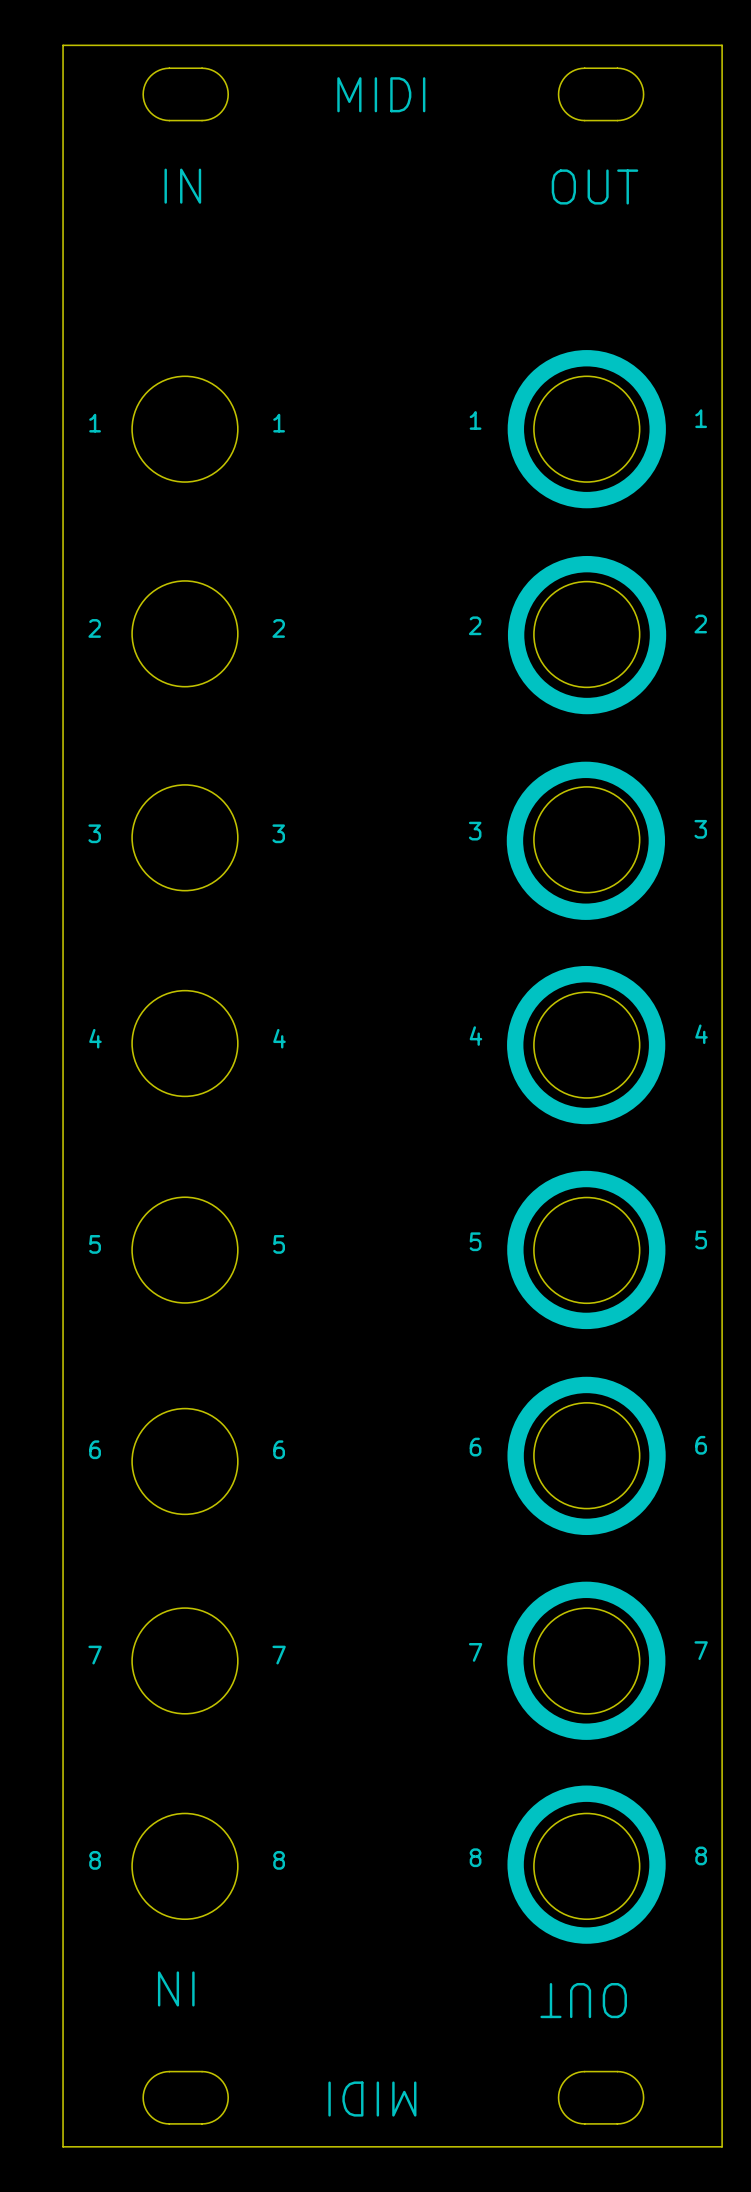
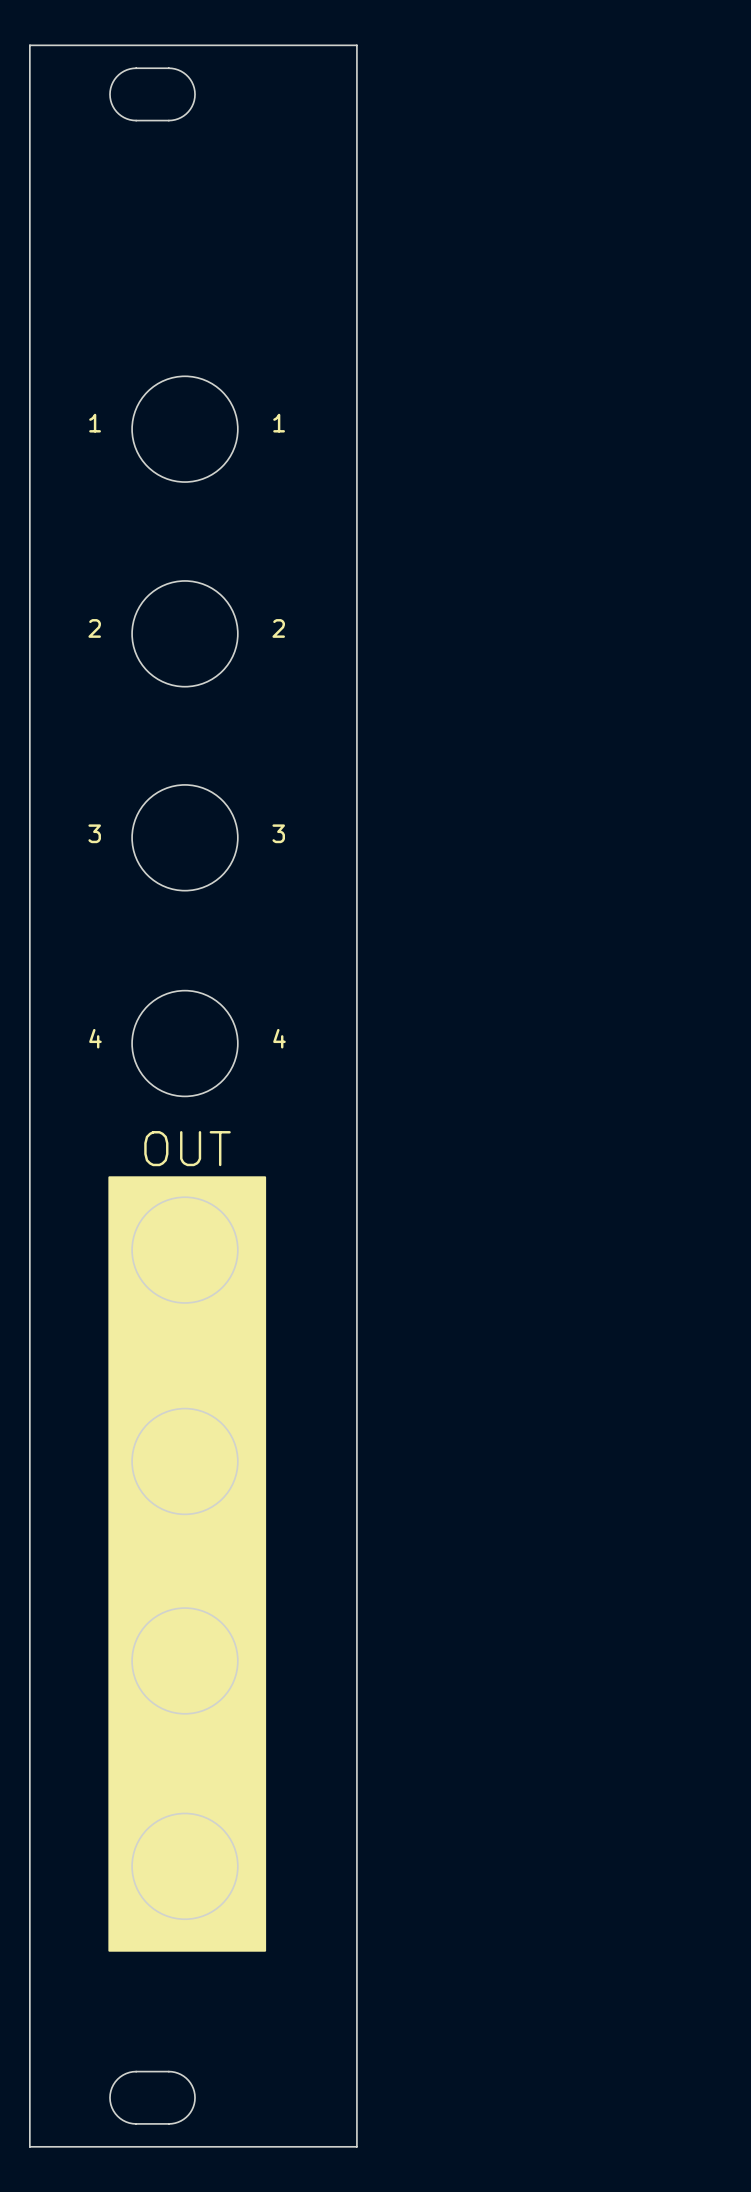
board edge: (63, 45) (63, 2146) -> (63, 45) (29, 45) (29, 2146) (63, 2146)
board edge: (356, 45) (722, 45) (722, 2146) (356, 2146) -> (356, 45) (356, 2146)
board edge: none -> (136, 68) (172, 68) (186, 74) (192, 82) (194, 91) (194, 100) (188, 111) (181, 117) (168, 120) (132, 120) (118, 113) (110, 100) (111, 85) (121, 72) (136, 68)
board edge: (169, 68) (205, 68) (219, 74) (225, 82) (228, 91) (227, 100) (221, 111) (211, 118) (202, 120) (165, 120) (153, 115) (144, 101) (144, 87) (153, 73) (169, 68) -> none
board edge: (584, 68) (620, 68) (634, 74) (640, 82) (643, 91) (641, 103) (637, 111) (626, 118) (617, 120) (581, 120) (567, 113) (559, 100) (560, 85) (569, 72) (584, 68) -> none
text: MIDI (381, 94) -> none
text: IN (182, 186) -> none
text: OUT (594, 186) -> none
drawing: [507, 350, 666, 509] -> none
round board edge: [533, 375, 641, 483] -> none
text: 1 (701, 418) -> none
text: 1 (475, 420) -> none
drawing: [507, 555, 667, 715] -> none
round board edge: [533, 581, 641, 688] -> none
text: 2 (700, 624) -> none
text: 2 (475, 625) -> none
drawing: [506, 761, 666, 920] -> none
round board edge: [533, 786, 641, 894] -> none
text: 3 (700, 829) -> none
text: 3 (475, 831) -> none
drawing: [507, 965, 666, 1125] -> none
round board edge: [533, 991, 641, 1099] -> none
text: 4 (701, 1034) -> none
text: 4 (475, 1036) -> none
text: none -> OUT (187, 1148)
drawing: [507, 1170, 666, 1330] -> none
drawing: none -> [108, 1176, 267, 1952]
round board edge: [533, 1197, 641, 1304] -> none
text: 5 (701, 1239) -> none
text: 5 (475, 1241) -> none
text: 5 (95, 1244) -> none
text: 5 (279, 1244) -> none
drawing: [507, 1376, 666, 1536] -> none
round board edge: [533, 1402, 641, 1510] -> none
text: 6 (701, 1445) -> none
text: 6 (475, 1447) -> none
text: 6 (95, 1449) -> none
text: 6 (279, 1449) -> none
drawing: [507, 1581, 666, 1740] -> none
round board edge: [533, 1607, 641, 1715] -> none
text: 7 (701, 1650) -> none
text: 7 (475, 1652) -> none
text: 7 (95, 1655) -> none
text: 7 (279, 1655) -> none
drawing: [507, 1785, 666, 1944] -> none
round board edge: [533, 1813, 641, 1920] -> none
text: 8 (701, 1855) -> none
text: 8 (475, 1857) -> none
text: 8 (95, 1860) -> none
text: 8 (279, 1860) -> none
text: IN (176, 1988) -> none
text: OUT (583, 2000) -> none
board edge: none -> (136, 2071) (172, 2071) (186, 2078) (192, 2085) (194, 2094) (194, 2104) (188, 2115) (181, 2120) (168, 2123) (132, 2123) (120, 2118) (110, 2104) (110, 2090) (120, 2077) (136, 2071)
board edge: (169, 2071) (205, 2071) (217, 2077) (224, 2084) (227, 2094) (227, 2104) (222, 2113) (212, 2121) (202, 2123) (166, 2123) (151, 2117) (143, 2104) (144, 2088) (154, 2076) (169, 2071) -> none
board edge: (584, 2071) (620, 2071) (634, 2078) (640, 2085) (643, 2094) (641, 2107) (637, 2115) (629, 2120) (617, 2123) (581, 2123) (567, 2117) (559, 2104) (560, 2088) (569, 2076) (584, 2071) -> none
text: MIDI (372, 2099) -> none

